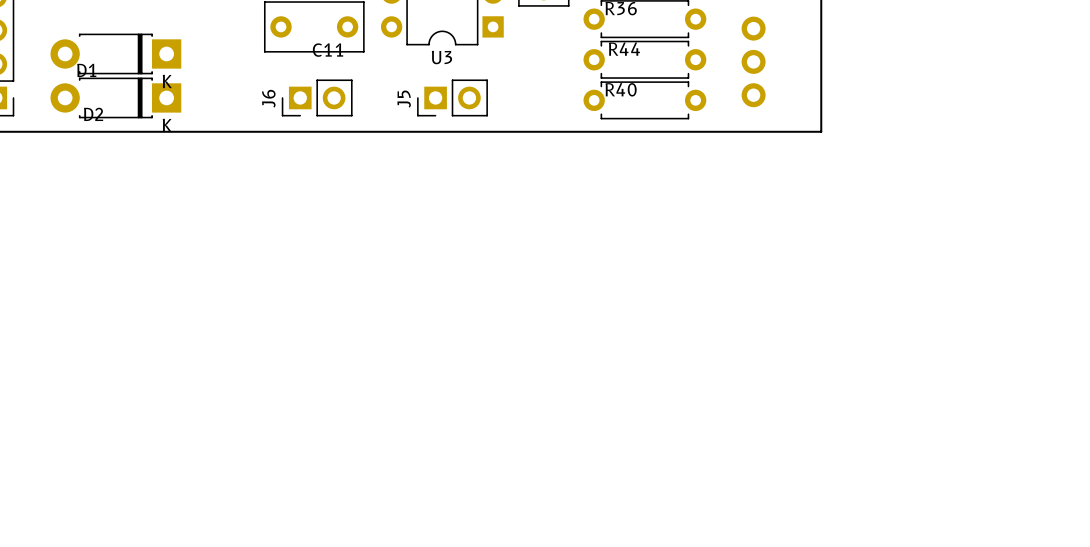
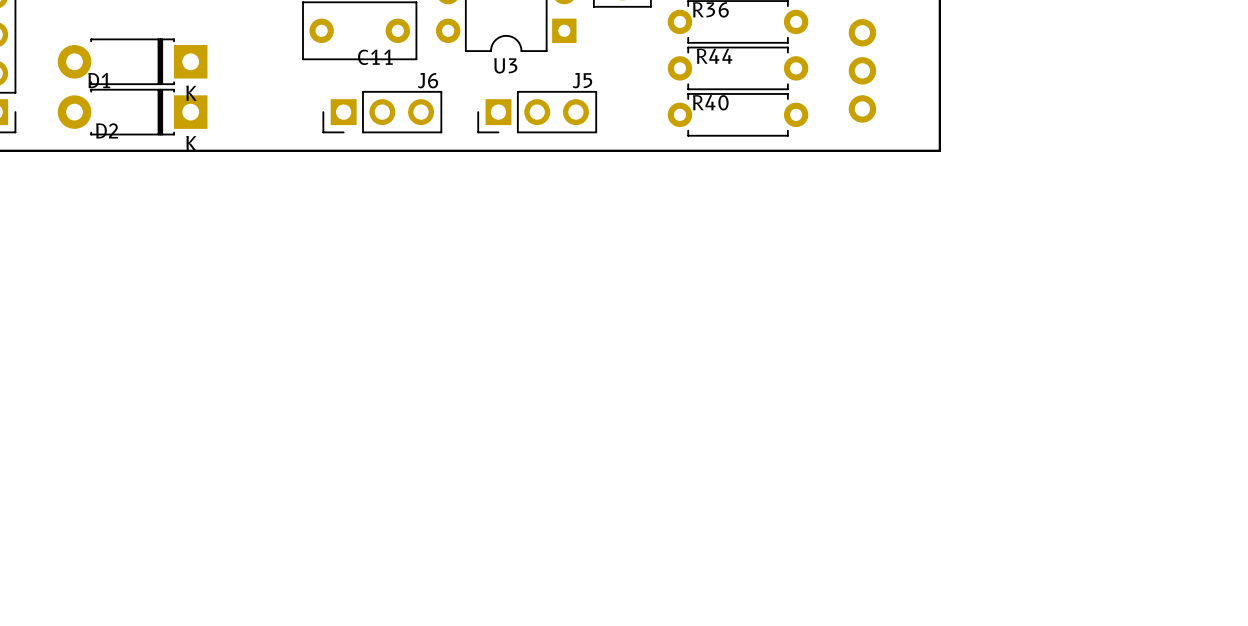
J6 footprint: [281, 79, 353, 117] -> [322, 90, 443, 134]
J5 footprint: [417, 79, 488, 117] -> [477, 90, 598, 134]
J6 name position: J6 (268, 98) -> J6 (427, 80)
J5 name position: J5 (404, 99) -> J5 (582, 80)

